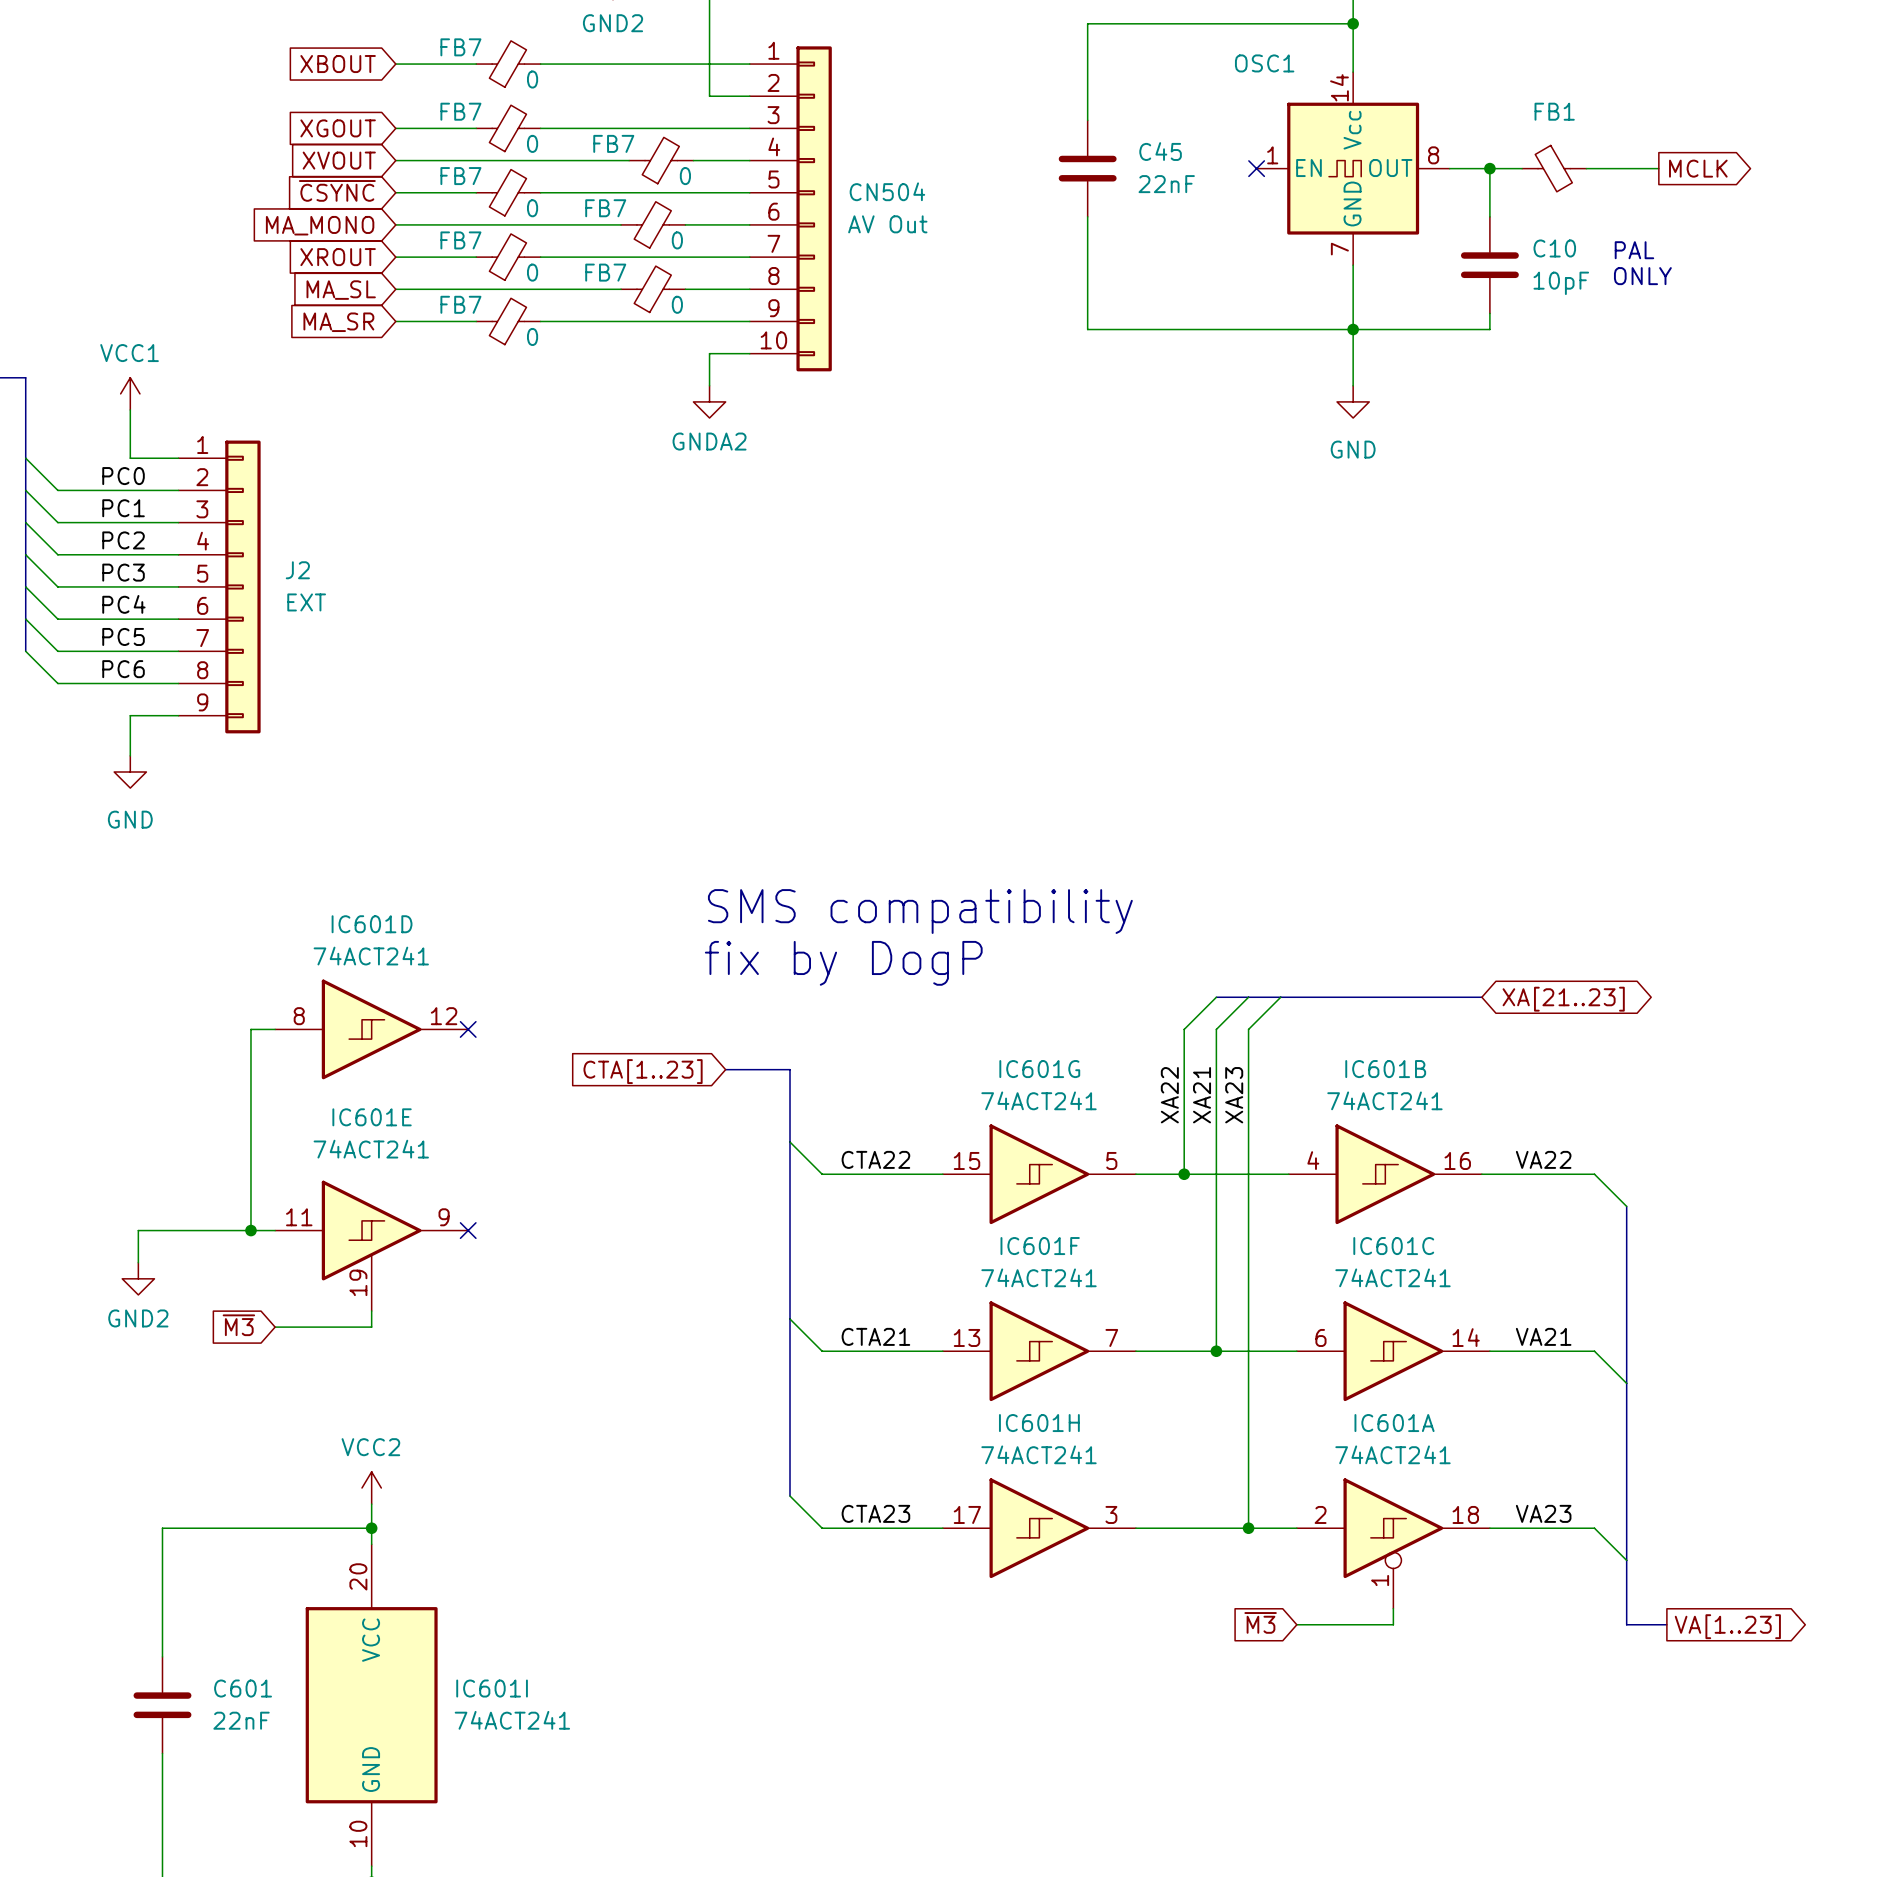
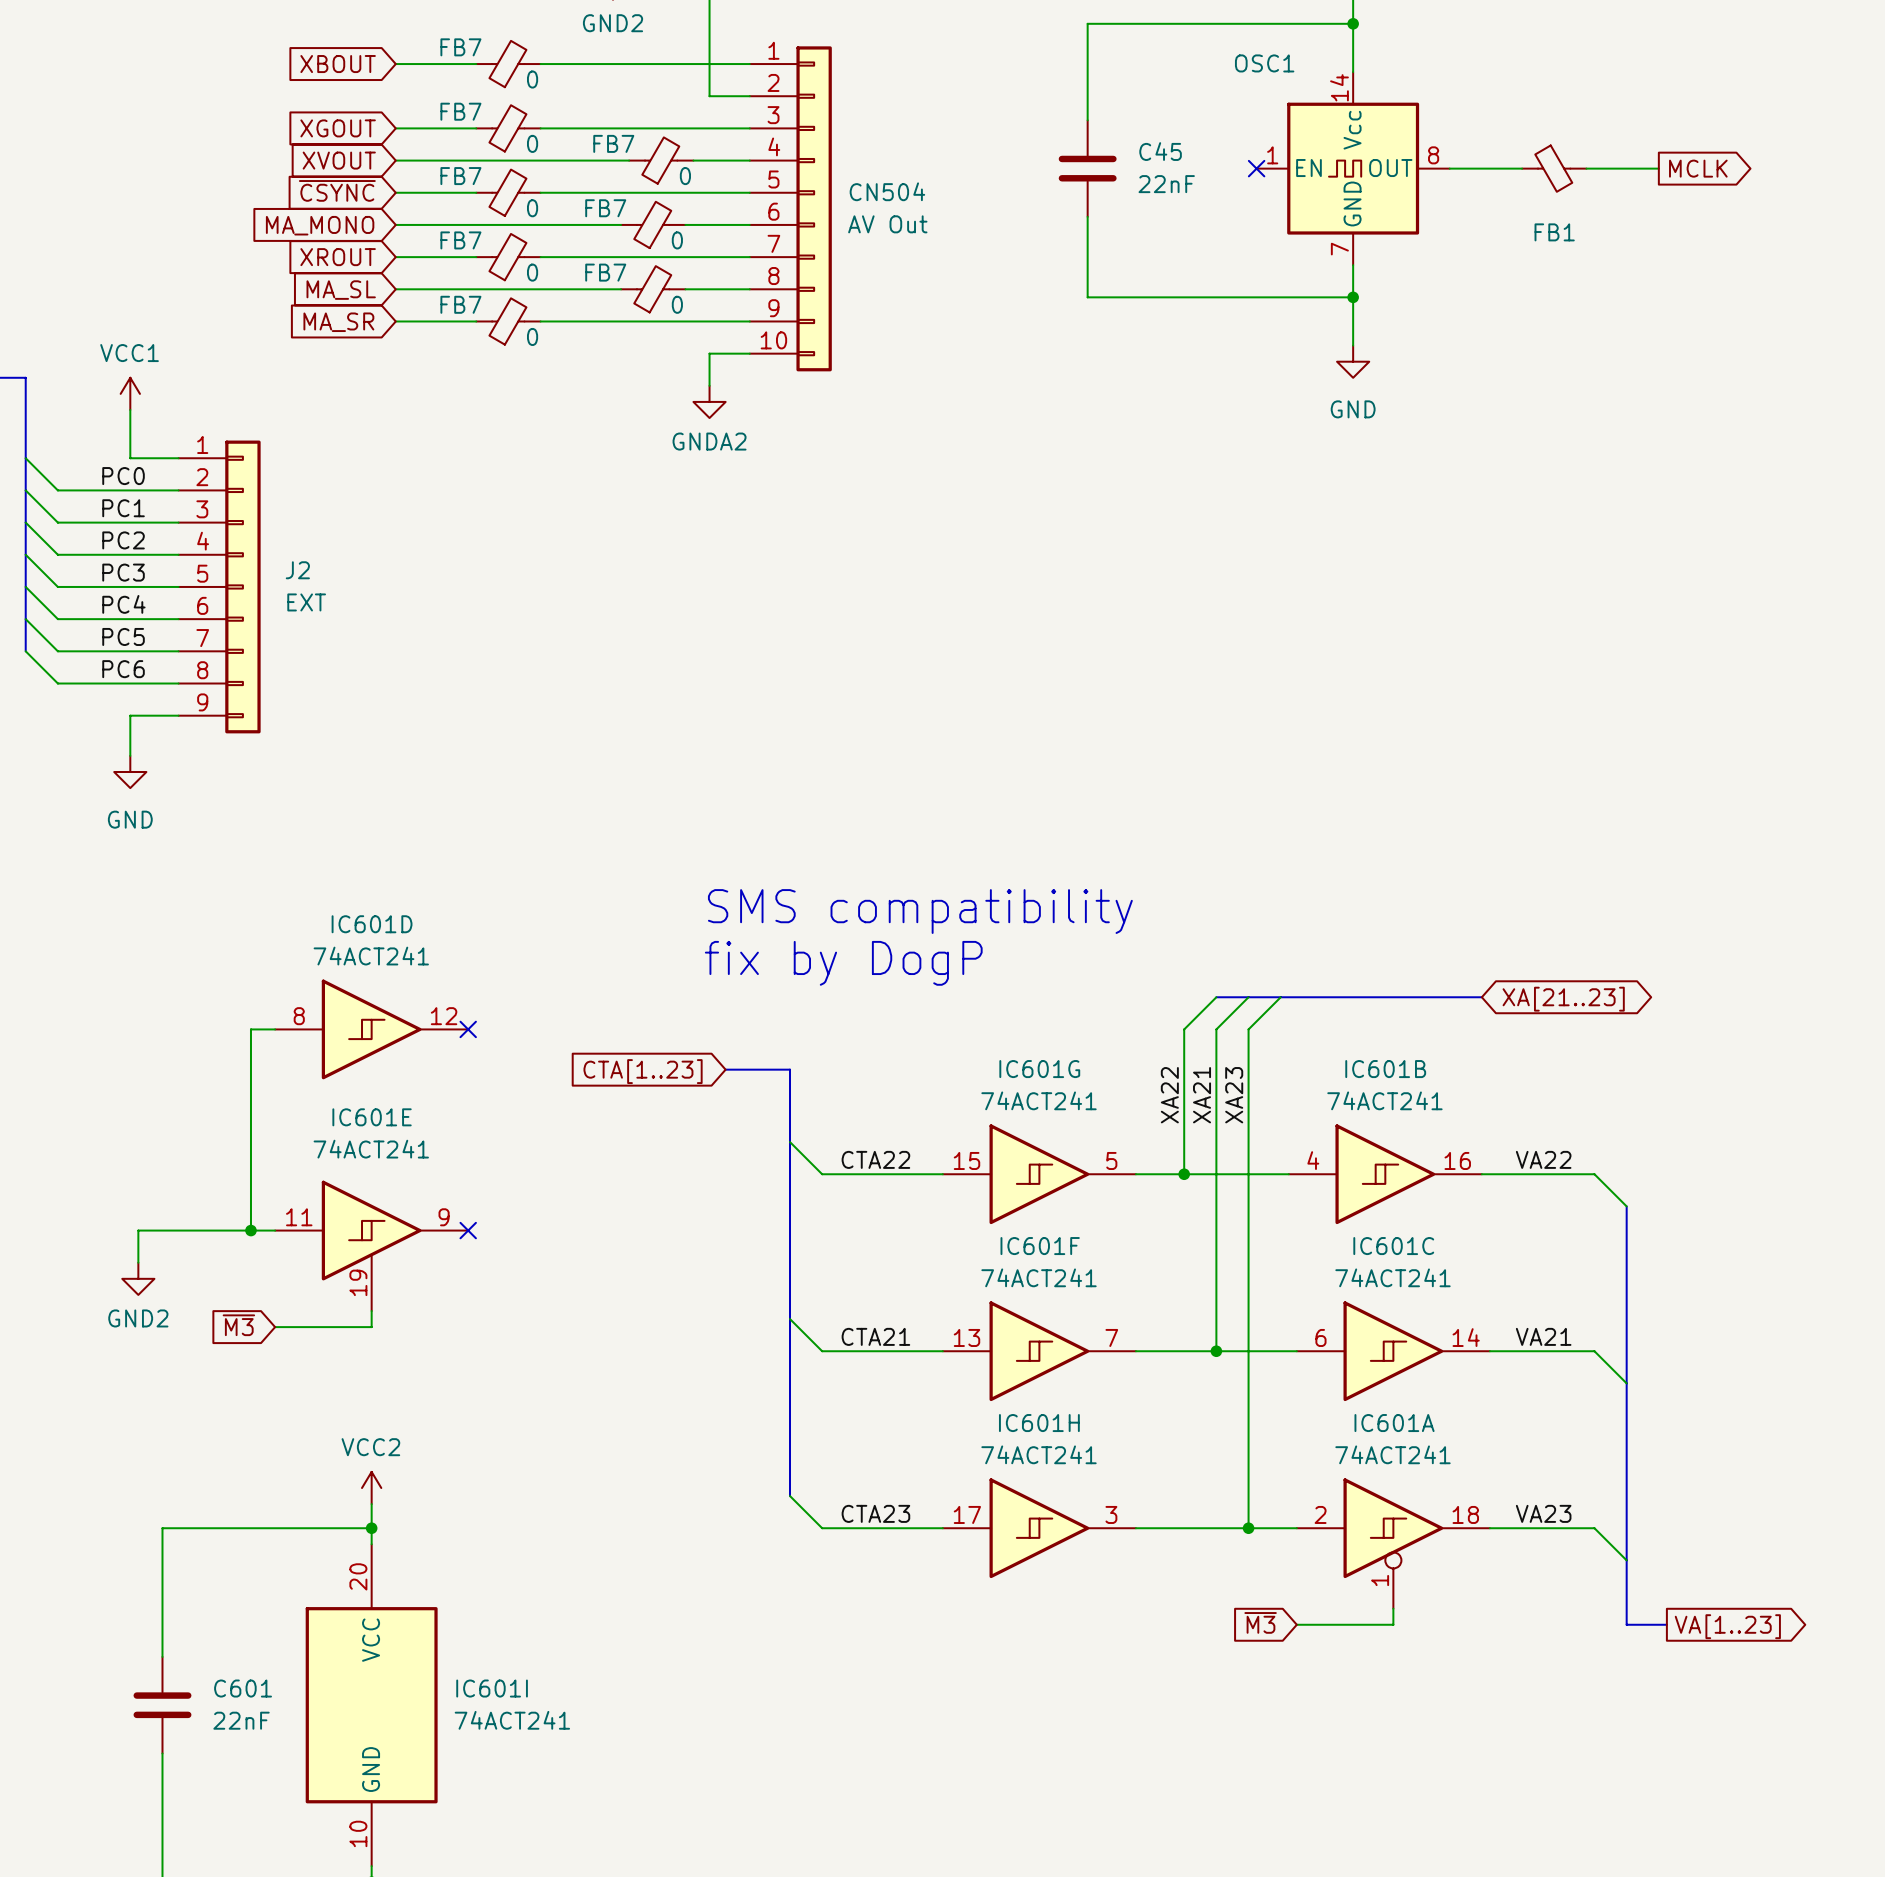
FB1 name position: FB1 (1554, 111) -> FB1 (1554, 232)
wire: (1489, 168) (1489, 216) -> none
junction: (1489, 168) -> none
text: PAL (1634, 250) -> none
C10: 10pF (1489, 265) -> none
text: ONLY (1642, 276) -> none
wire: (1087, 297) (1087, 329) (1489, 329) (1489, 313) -> (1087, 297) (1353, 297)
junction position: (1353, 329) -> (1353, 297)
wire: (1353, 345) (1353, 385) -> none
power symbol position: GND (1353, 401) -> GND (1353, 361)

